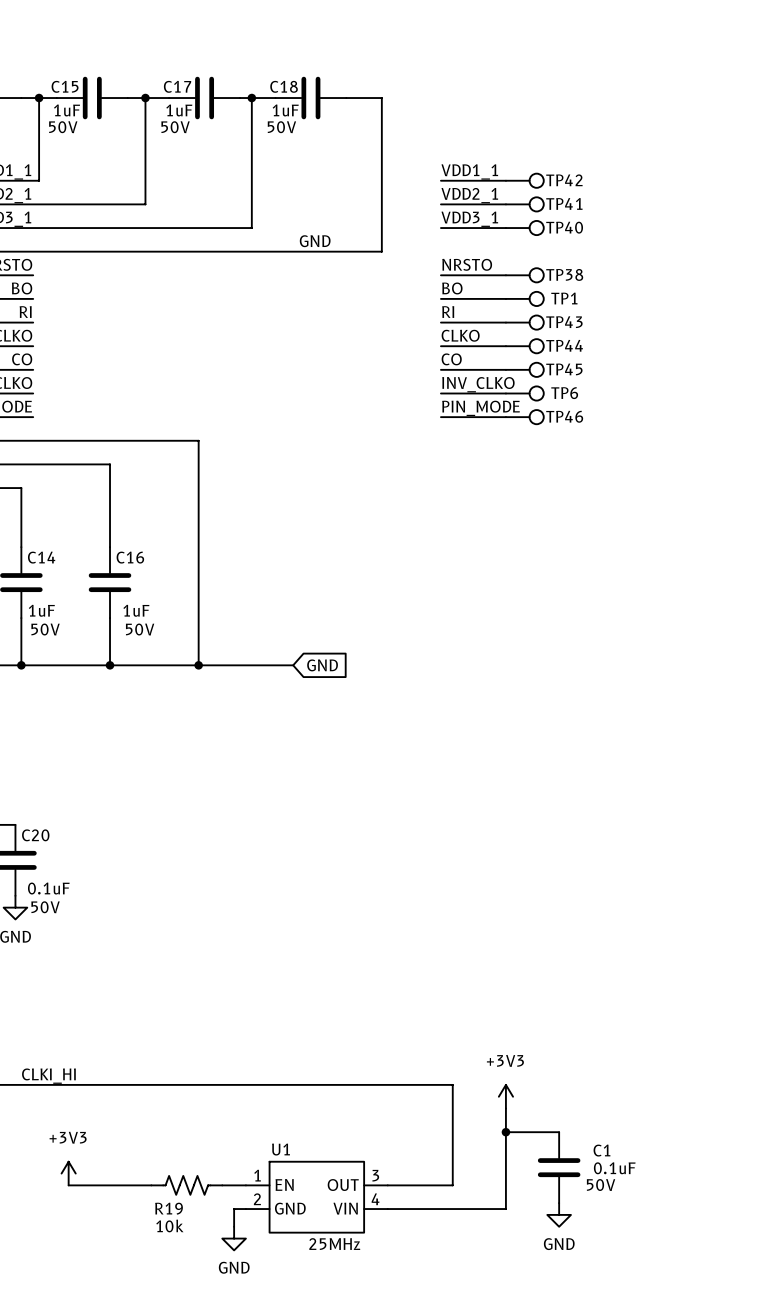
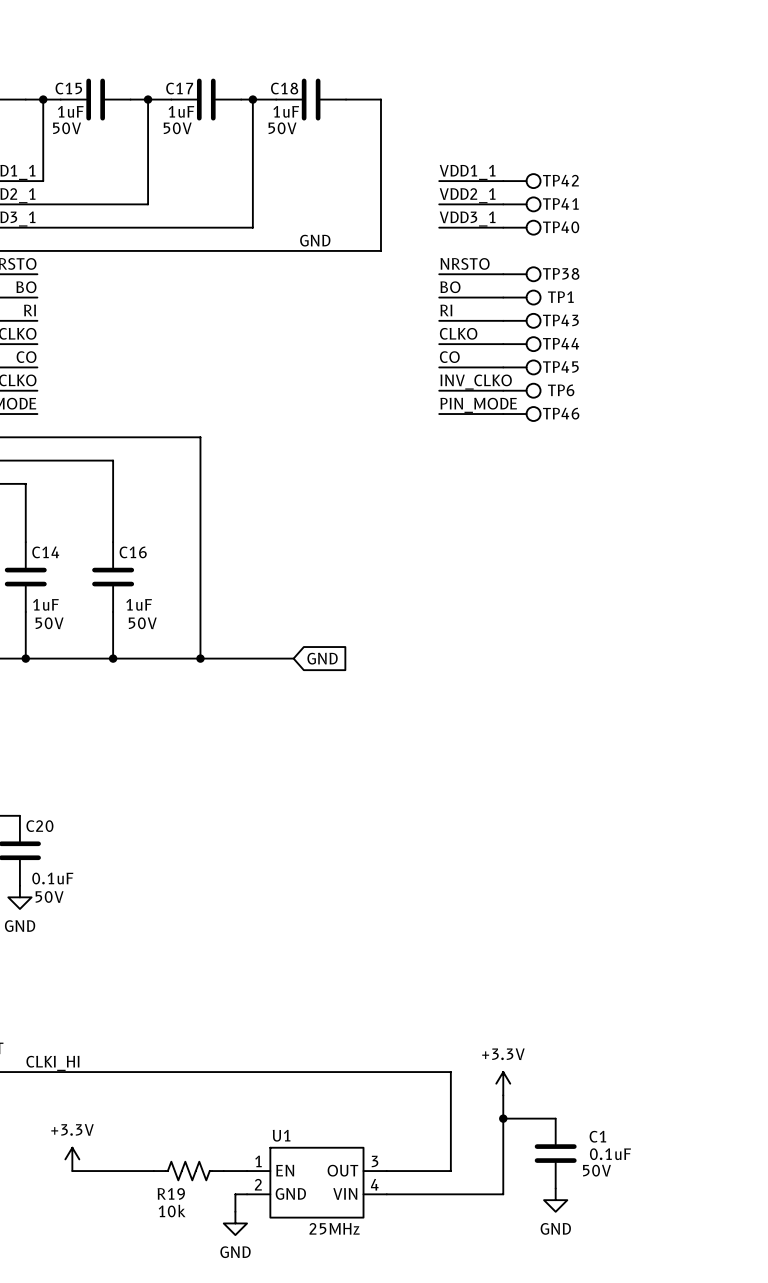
power symbol: +3V3 (505, 1096) -> +3.3V (503, 1083)
power symbol: +3V3 (68, 1173) -> +3.3V (72, 1159)

